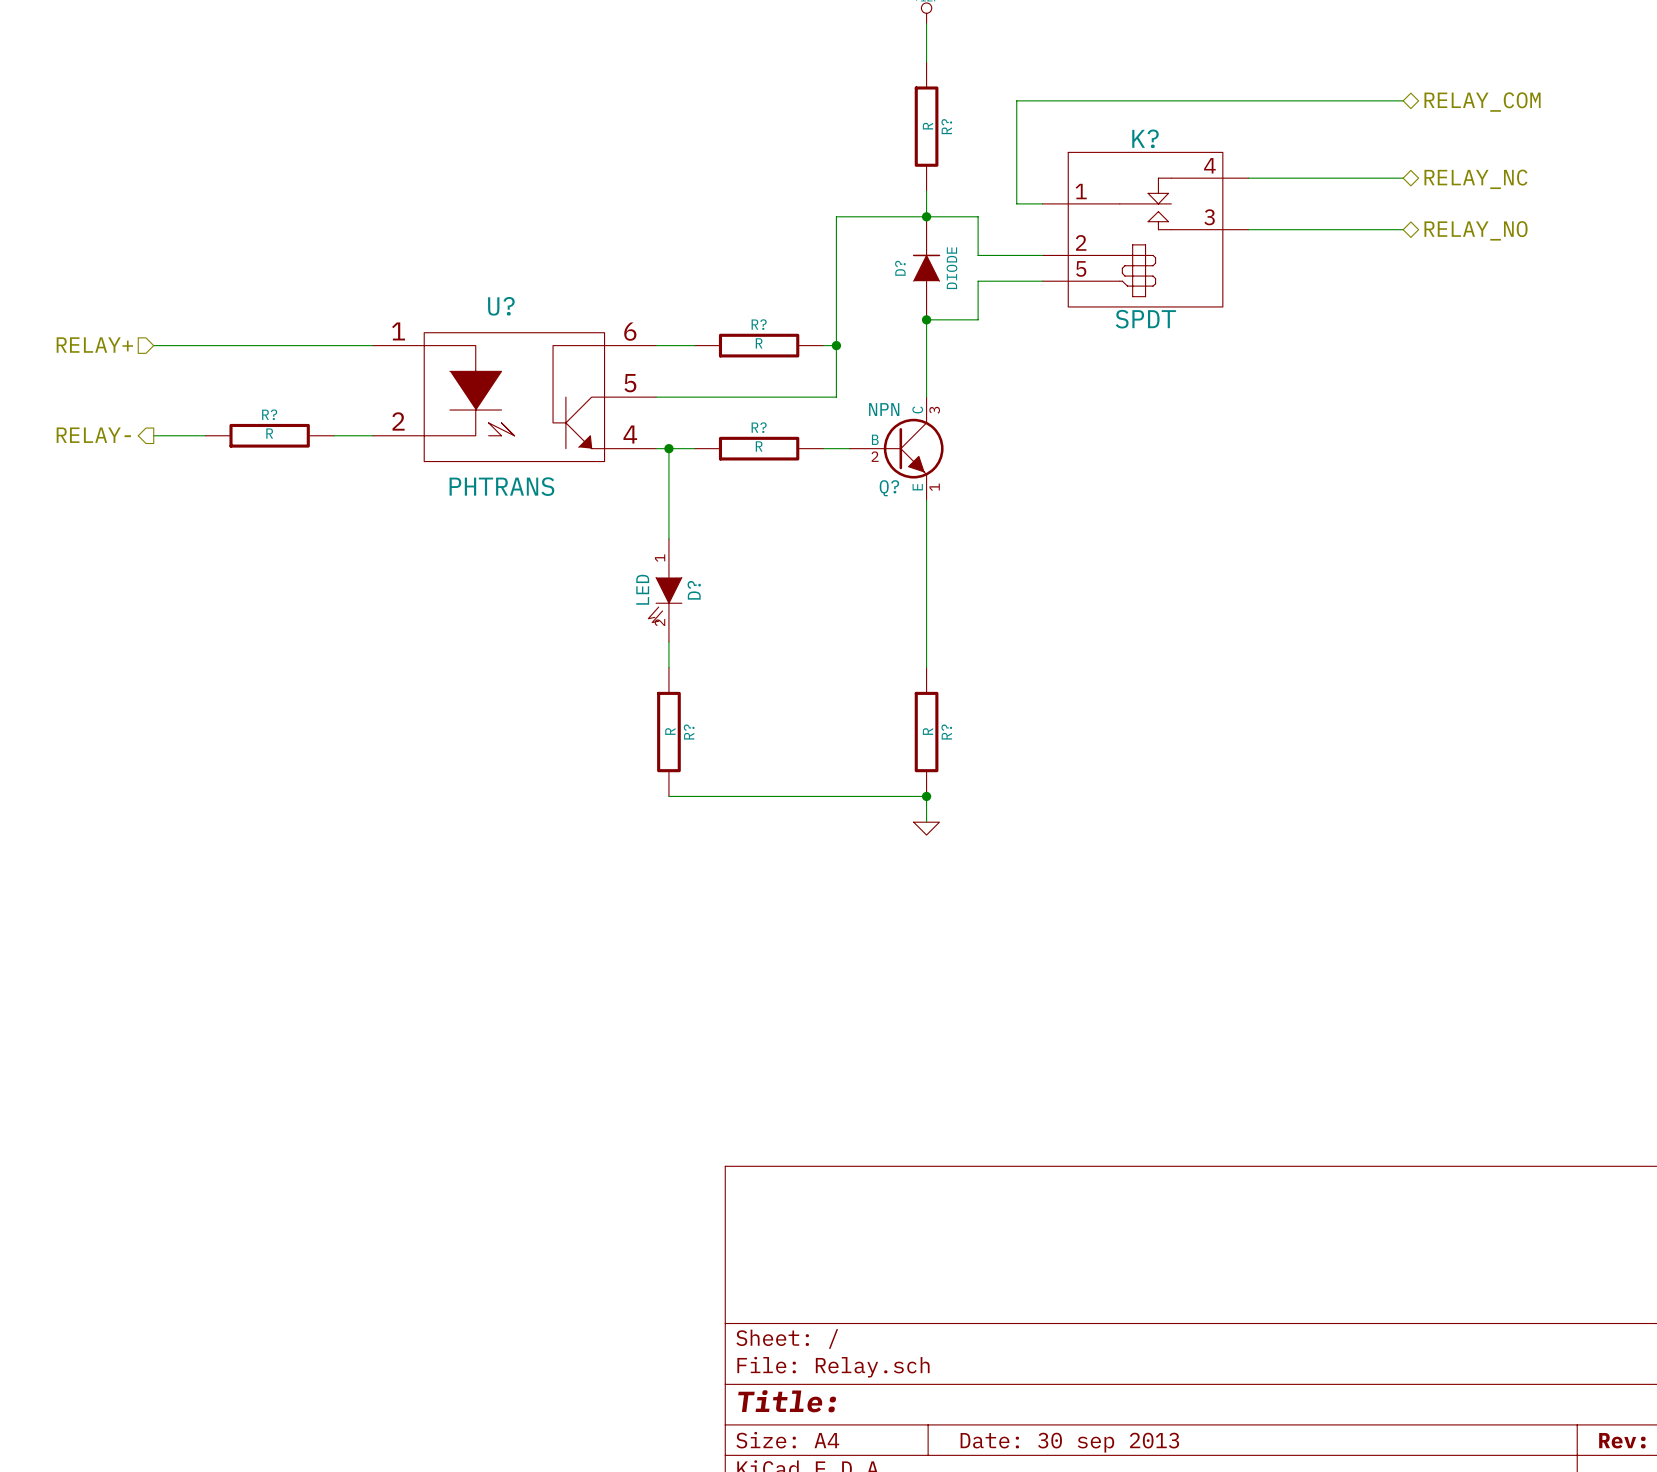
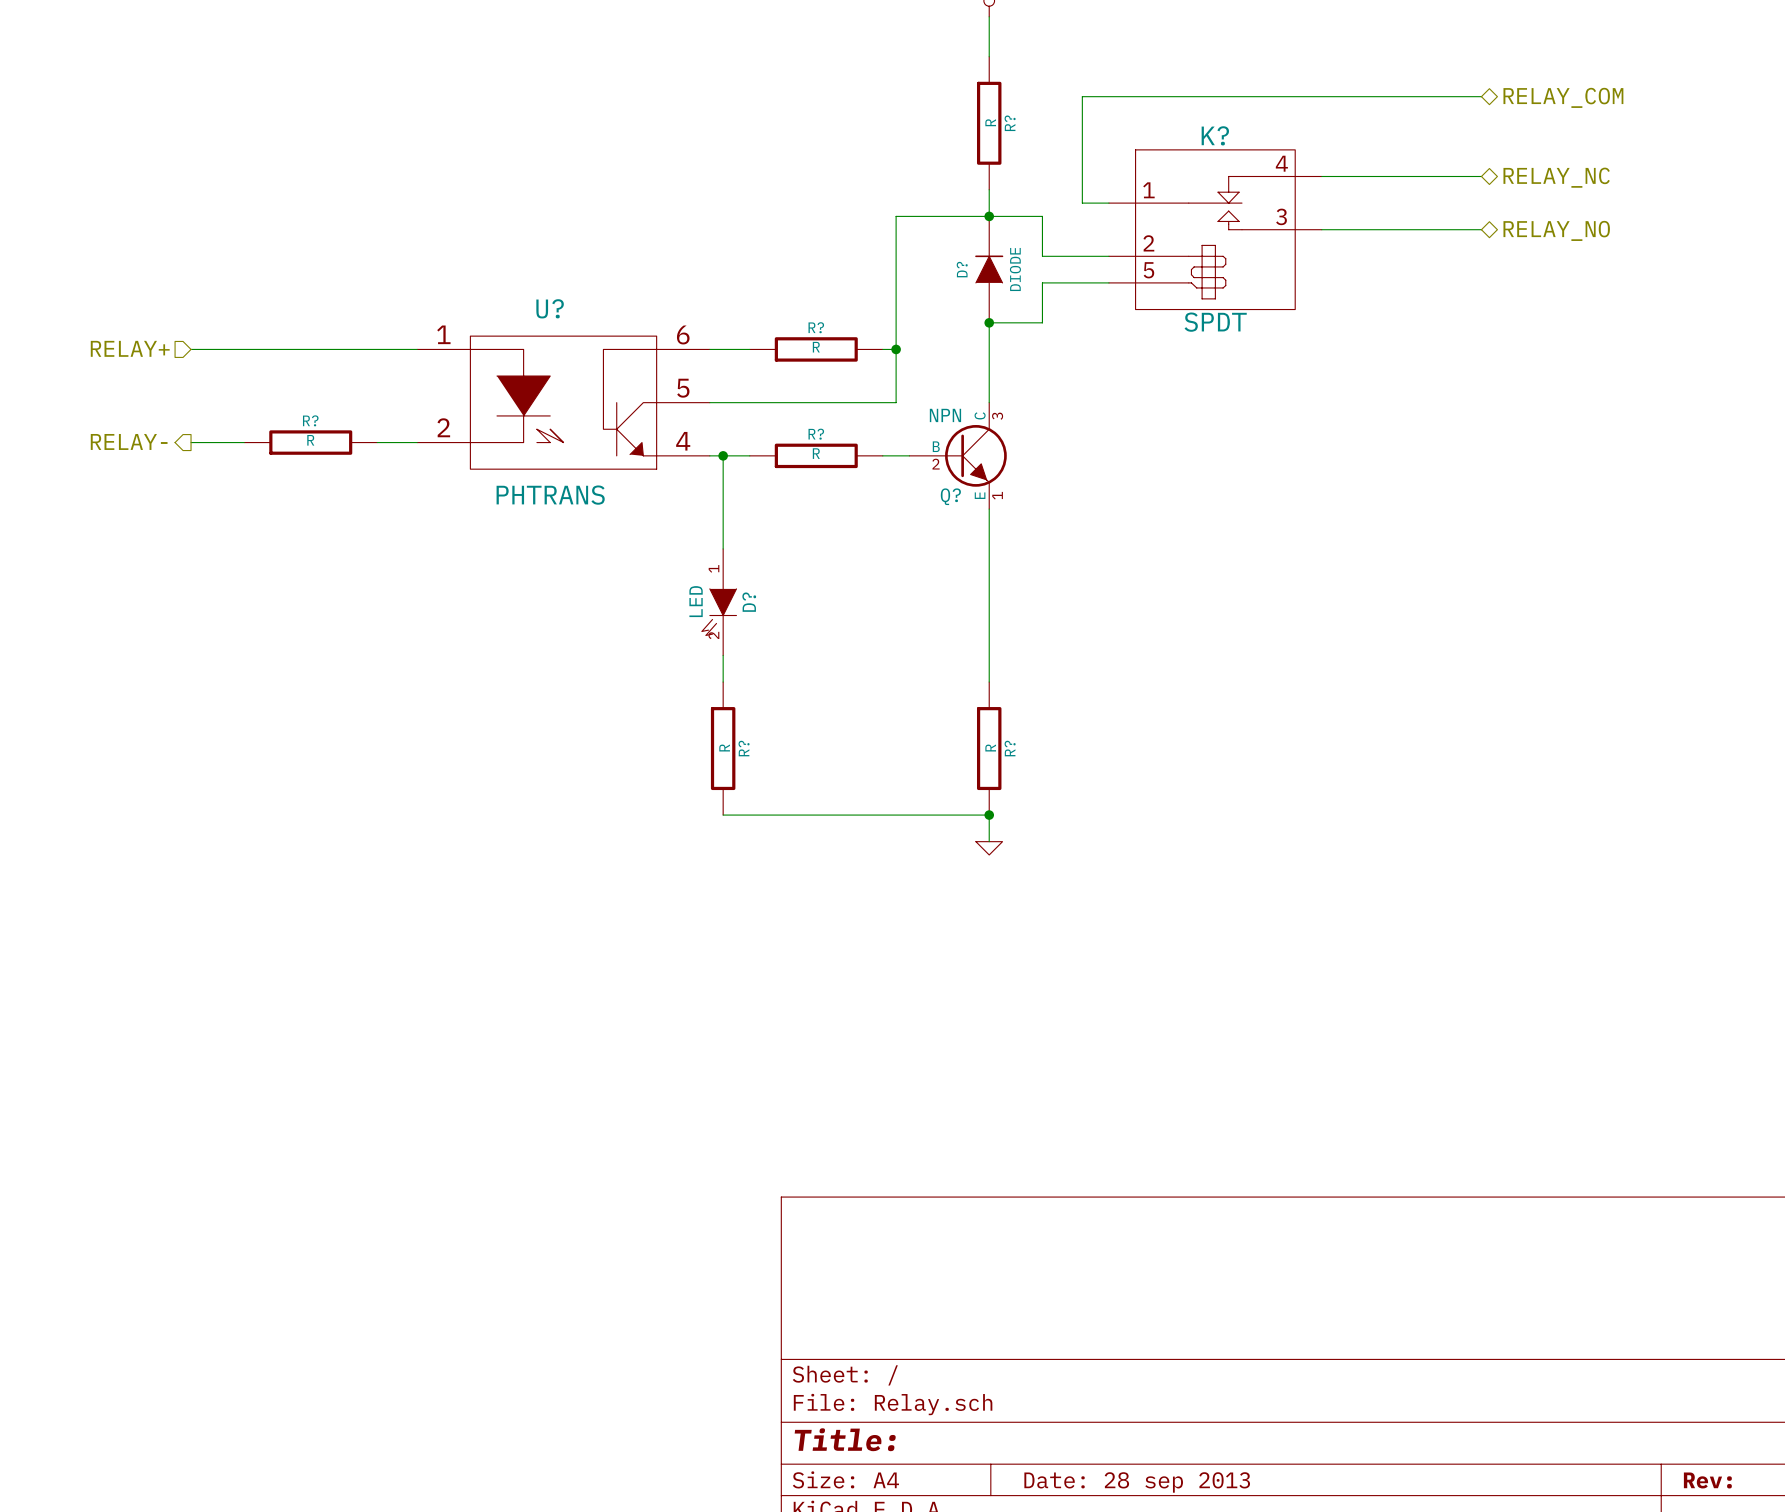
title block: Date: 30 sep 2013 (1069, 1442) -> Date: 28 sep 2013 (1137, 1482)

